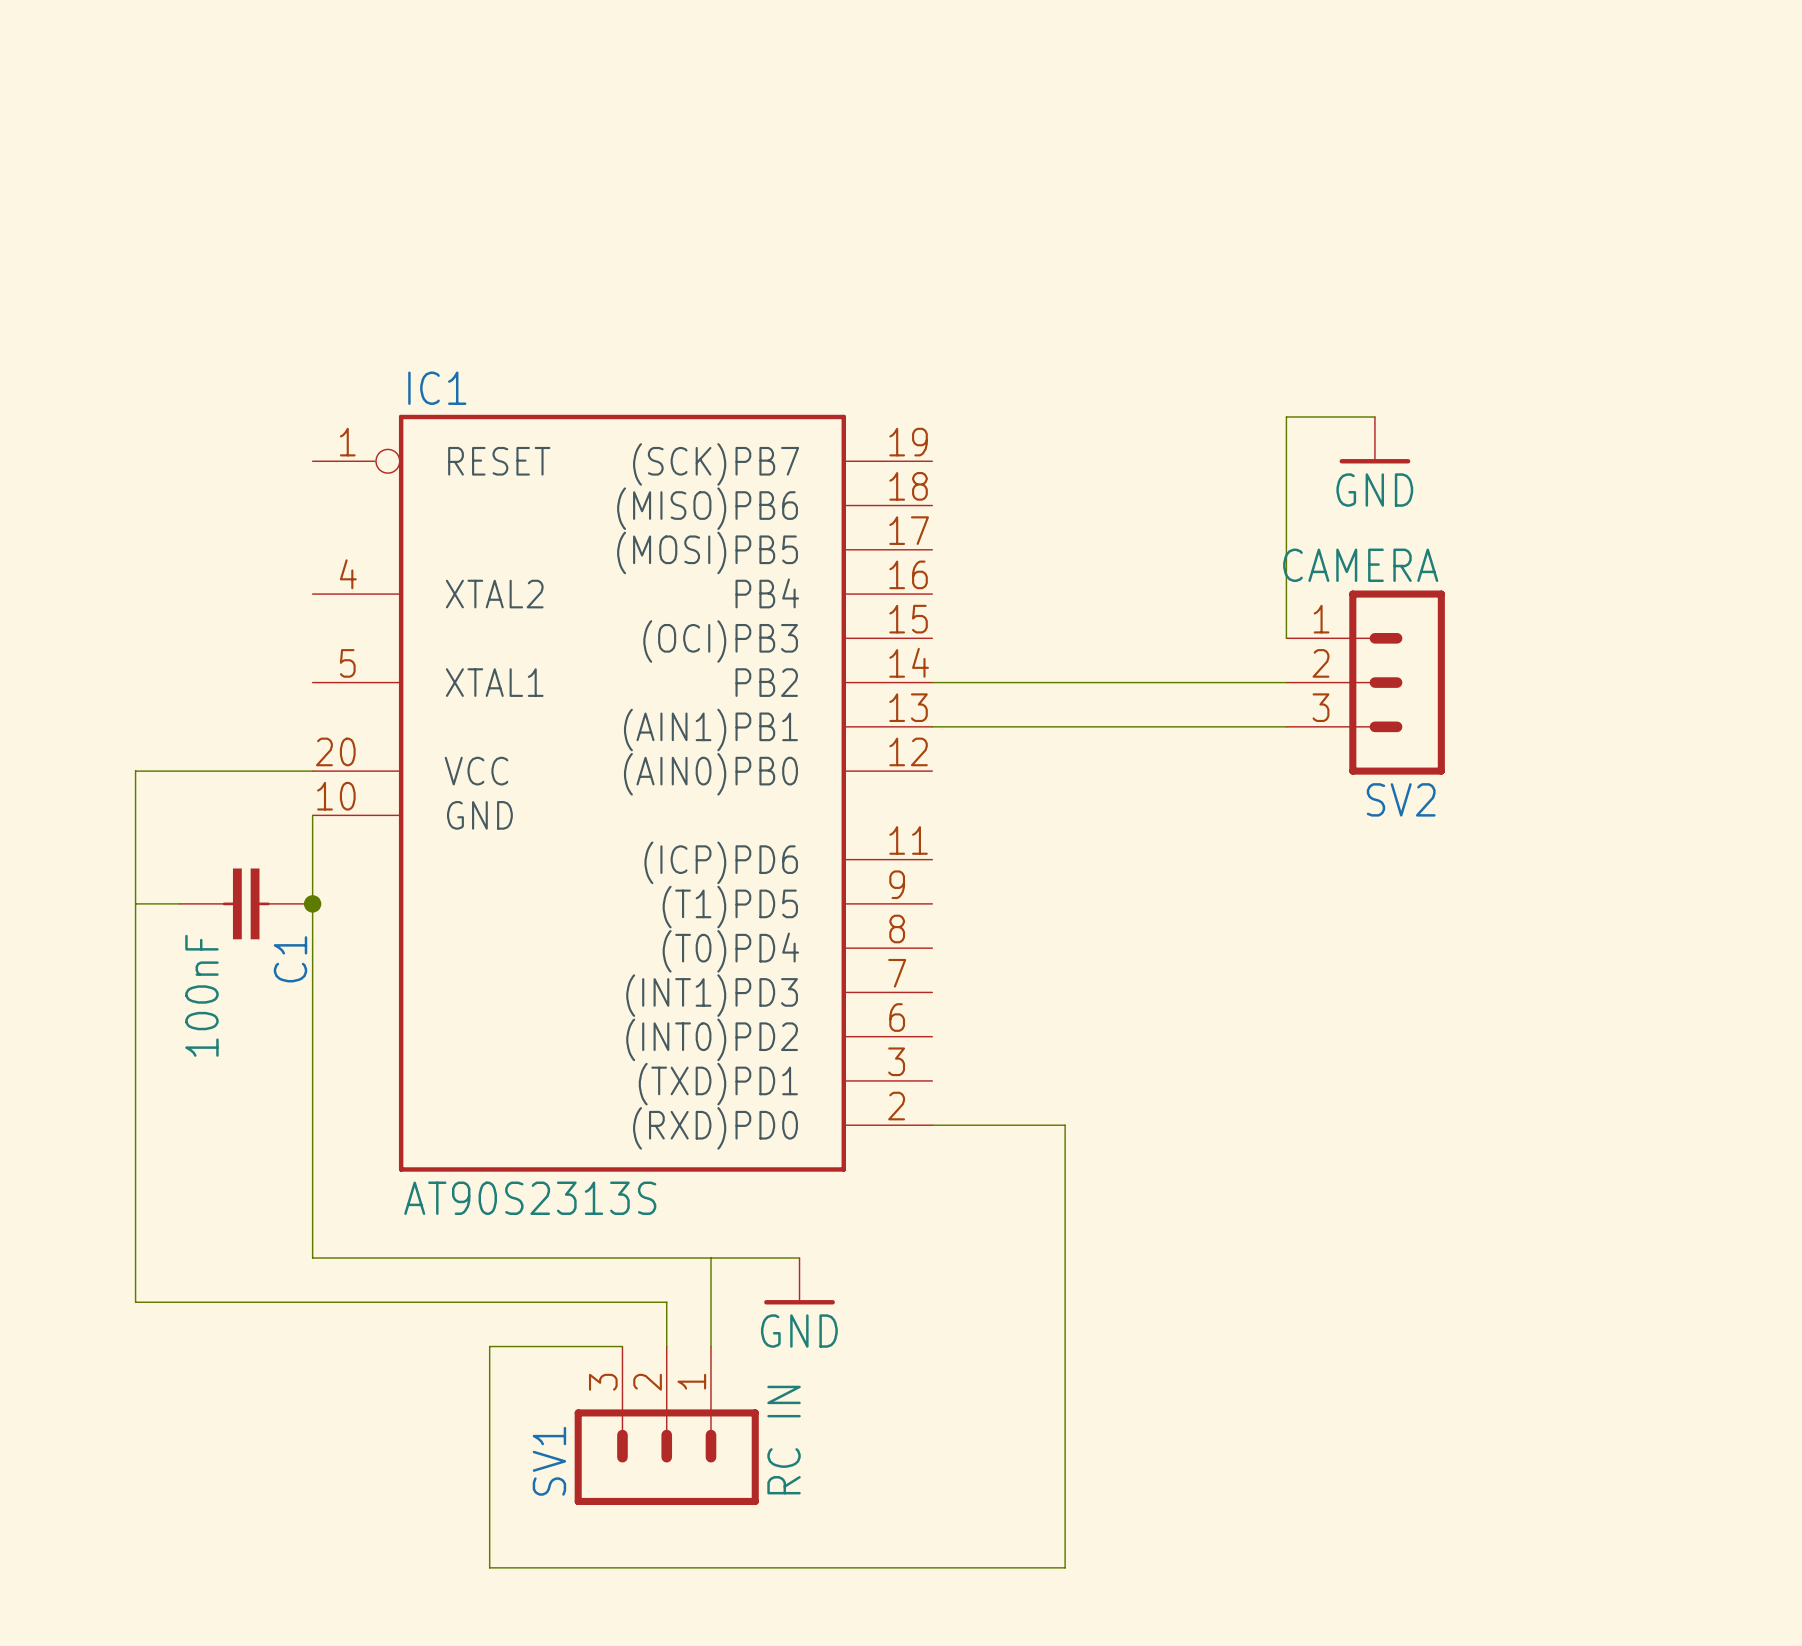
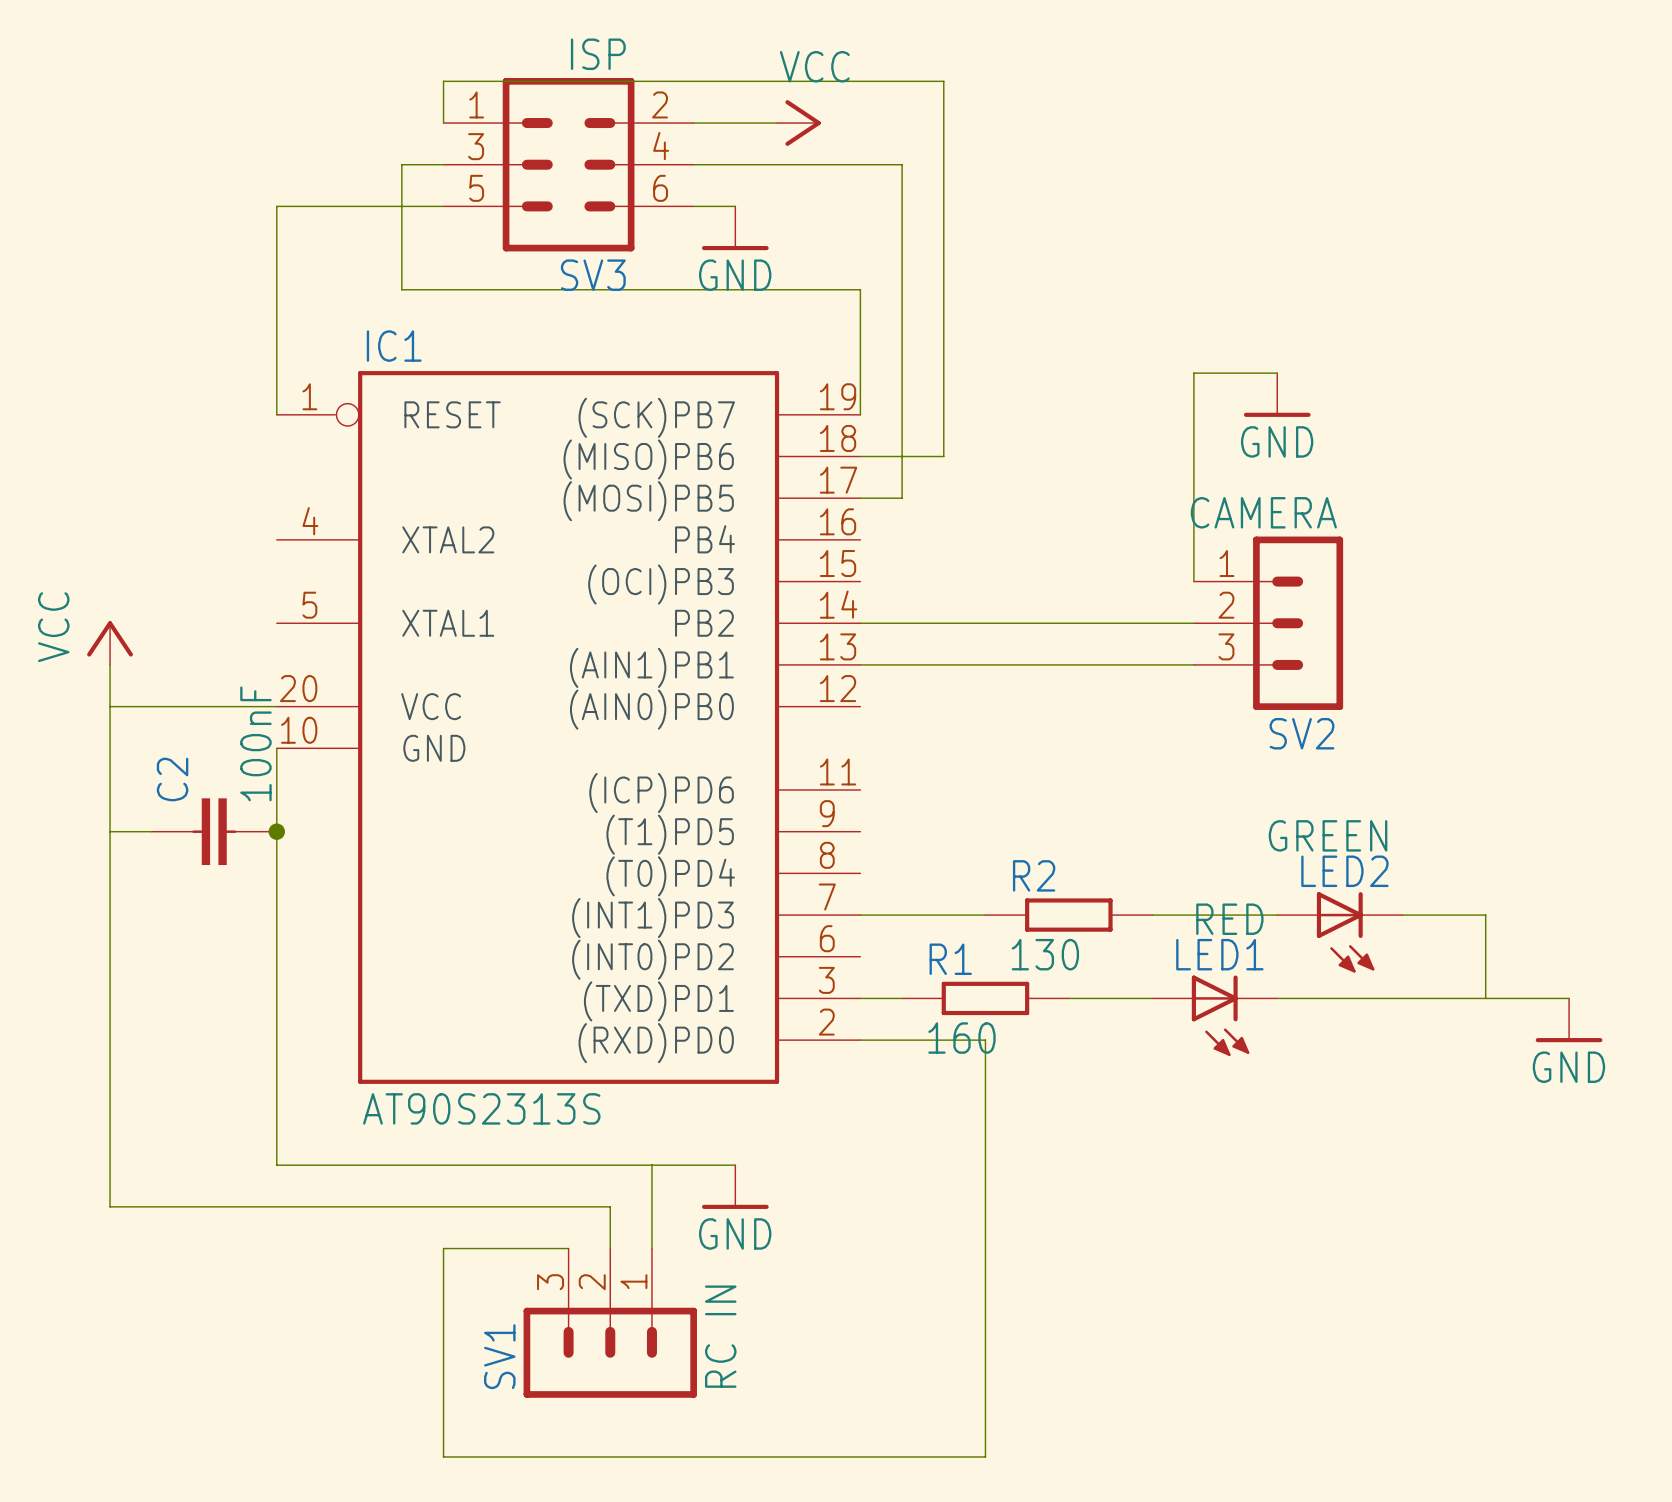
wire: none -> (443, 123) (443, 81) (943, 81) (943, 456) (860, 456)
wire: none -> (693, 123) (777, 123)
power symbol: none -> VCC (798, 123)
wire: none -> (443, 164) (401, 164) (401, 289) (860, 289) (860, 414)
SV3: none -> ISP (568, 164)
wire: none -> (693, 164) (902, 164) (902, 498) (860, 498)
wire: none -> (443, 206) (276, 206) (276, 414)
wire: none -> (693, 206) (735, 206)
power symbol: none -> GND (735, 228)
power symbol: none -> VCC (110, 643)
wire: none -> (110, 664) (110, 706)
C1 name: C1 (290, 959) -> C2 (172, 779)
wire: none -> (860, 915) (985, 915)
R2: none -> 130 (1068, 915)
wire: none -> (1152, 915) (1277, 915)
wire: none -> (1402, 915) (1485, 915) (1485, 998)
C1 value position: 100nF (201, 995) -> 100nF (255, 743)
LED2: none -> GREEN (1339, 932)
wire: none -> (860, 998) (902, 998)
R1: none -> 160 (985, 998)
wire: none -> (1068, 998) (1152, 998)
wire: none -> (1277, 998) (1569, 998)
LED1: none -> RED (1214, 1015)
power symbol: none -> GND (1569, 1020)

